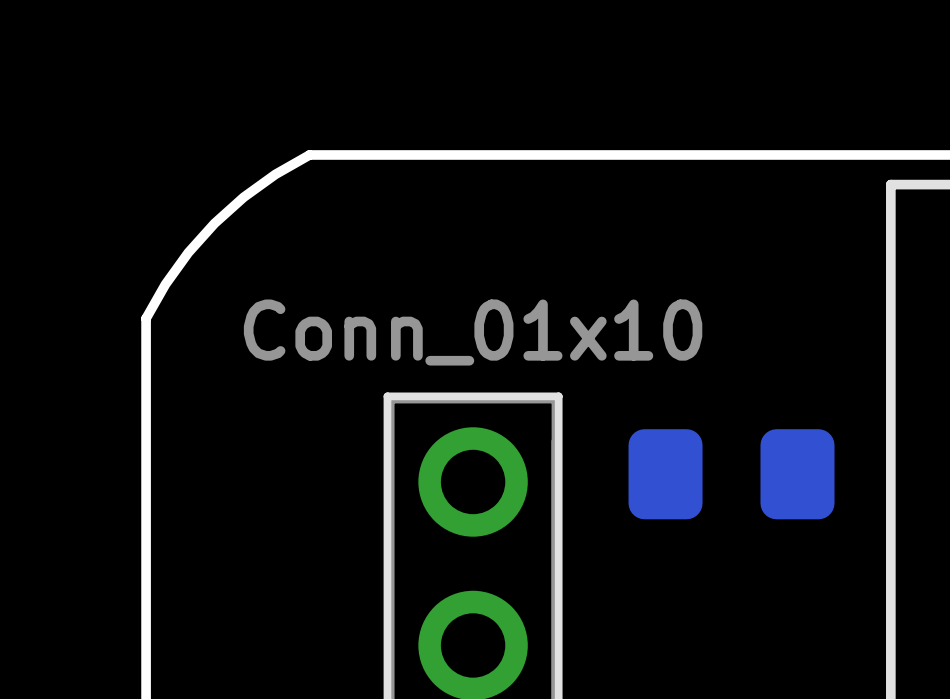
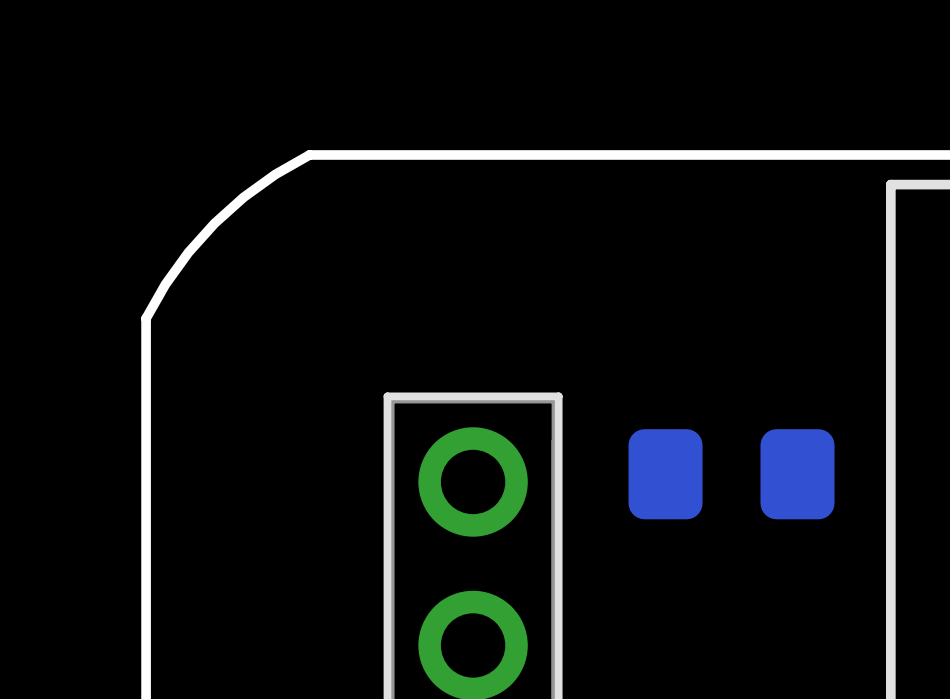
part value: Conn_01x10 (473, 332) -> none

